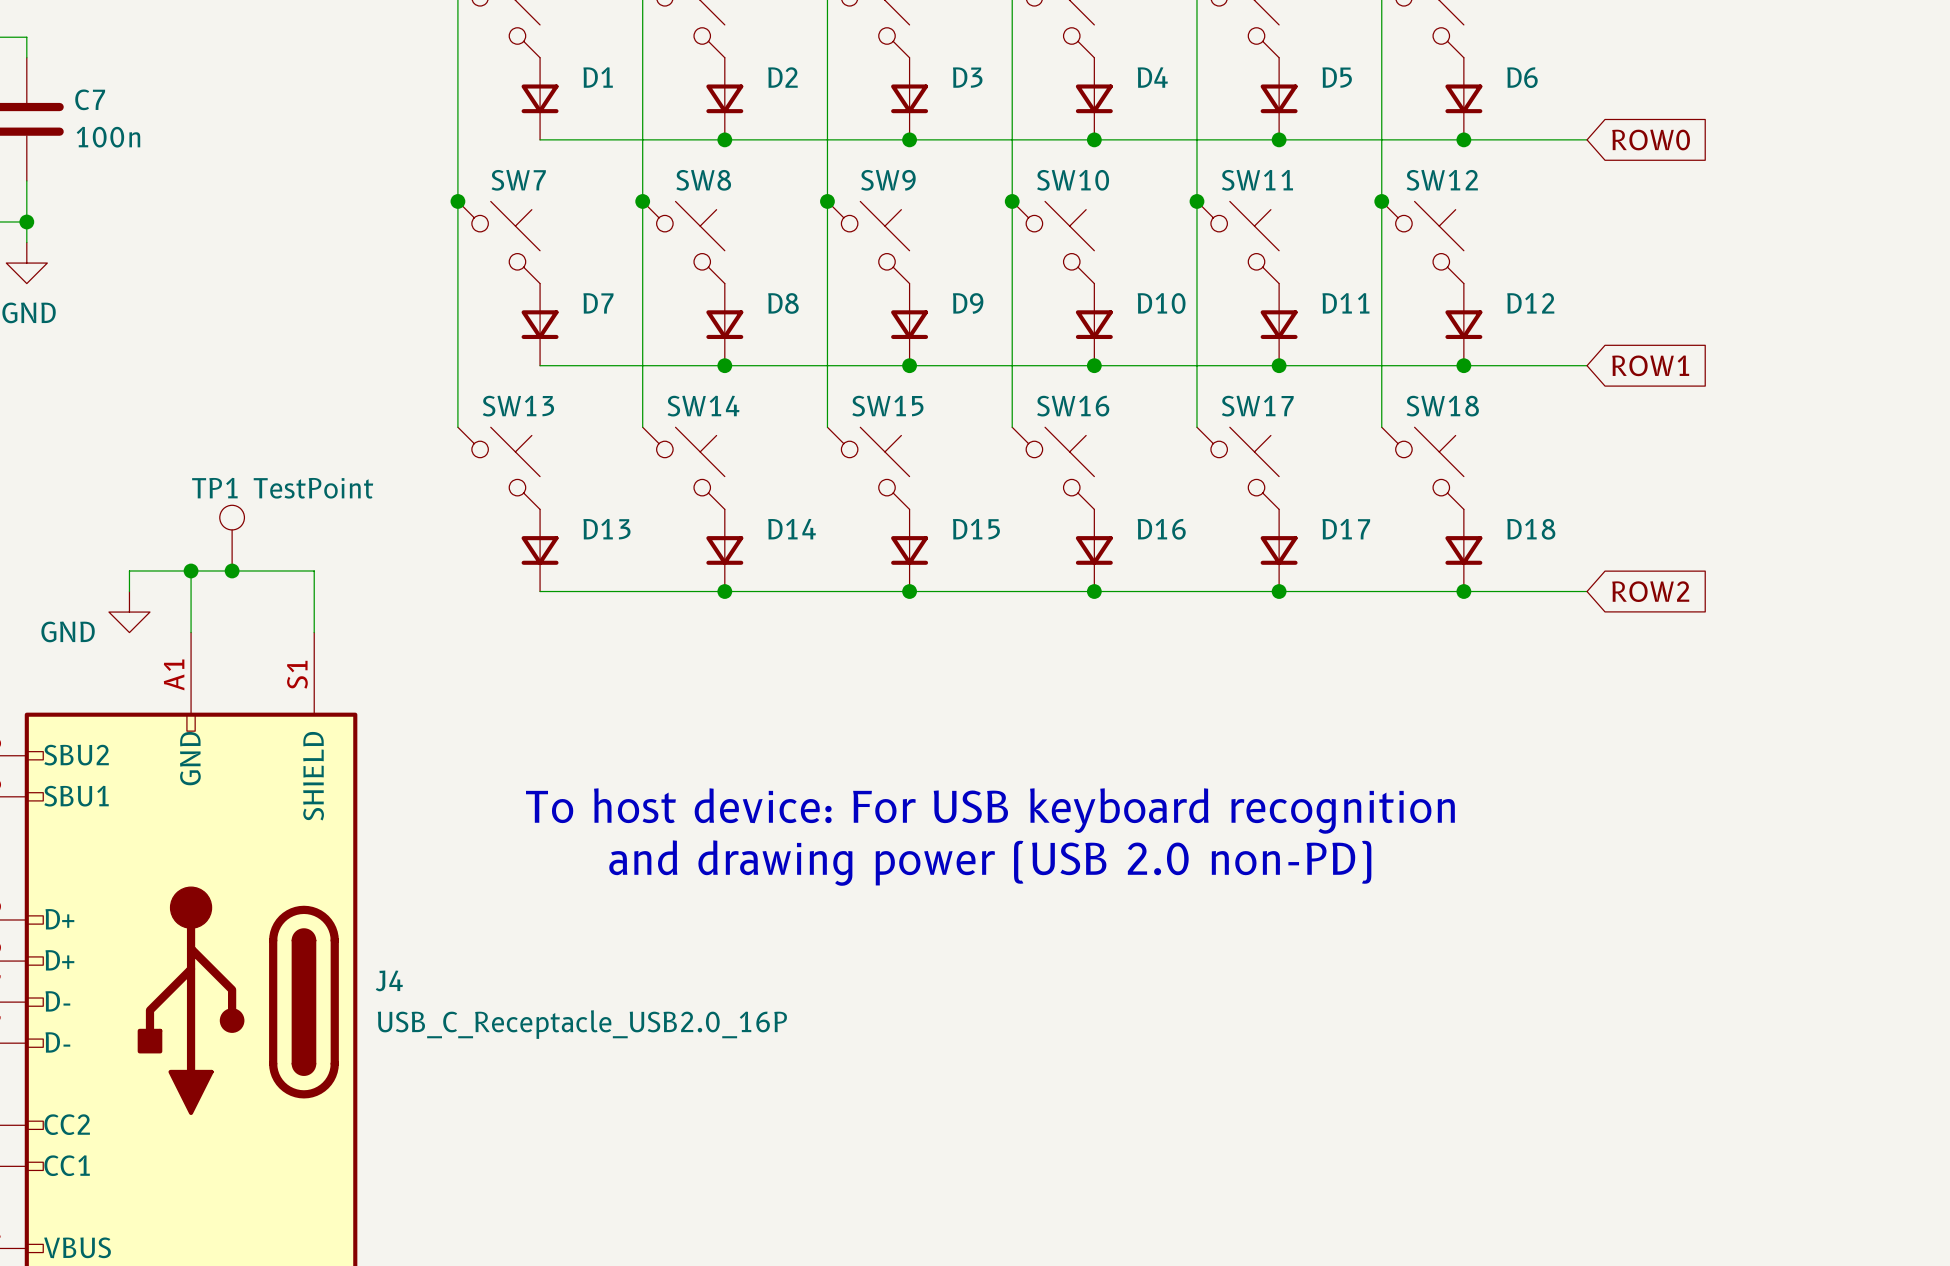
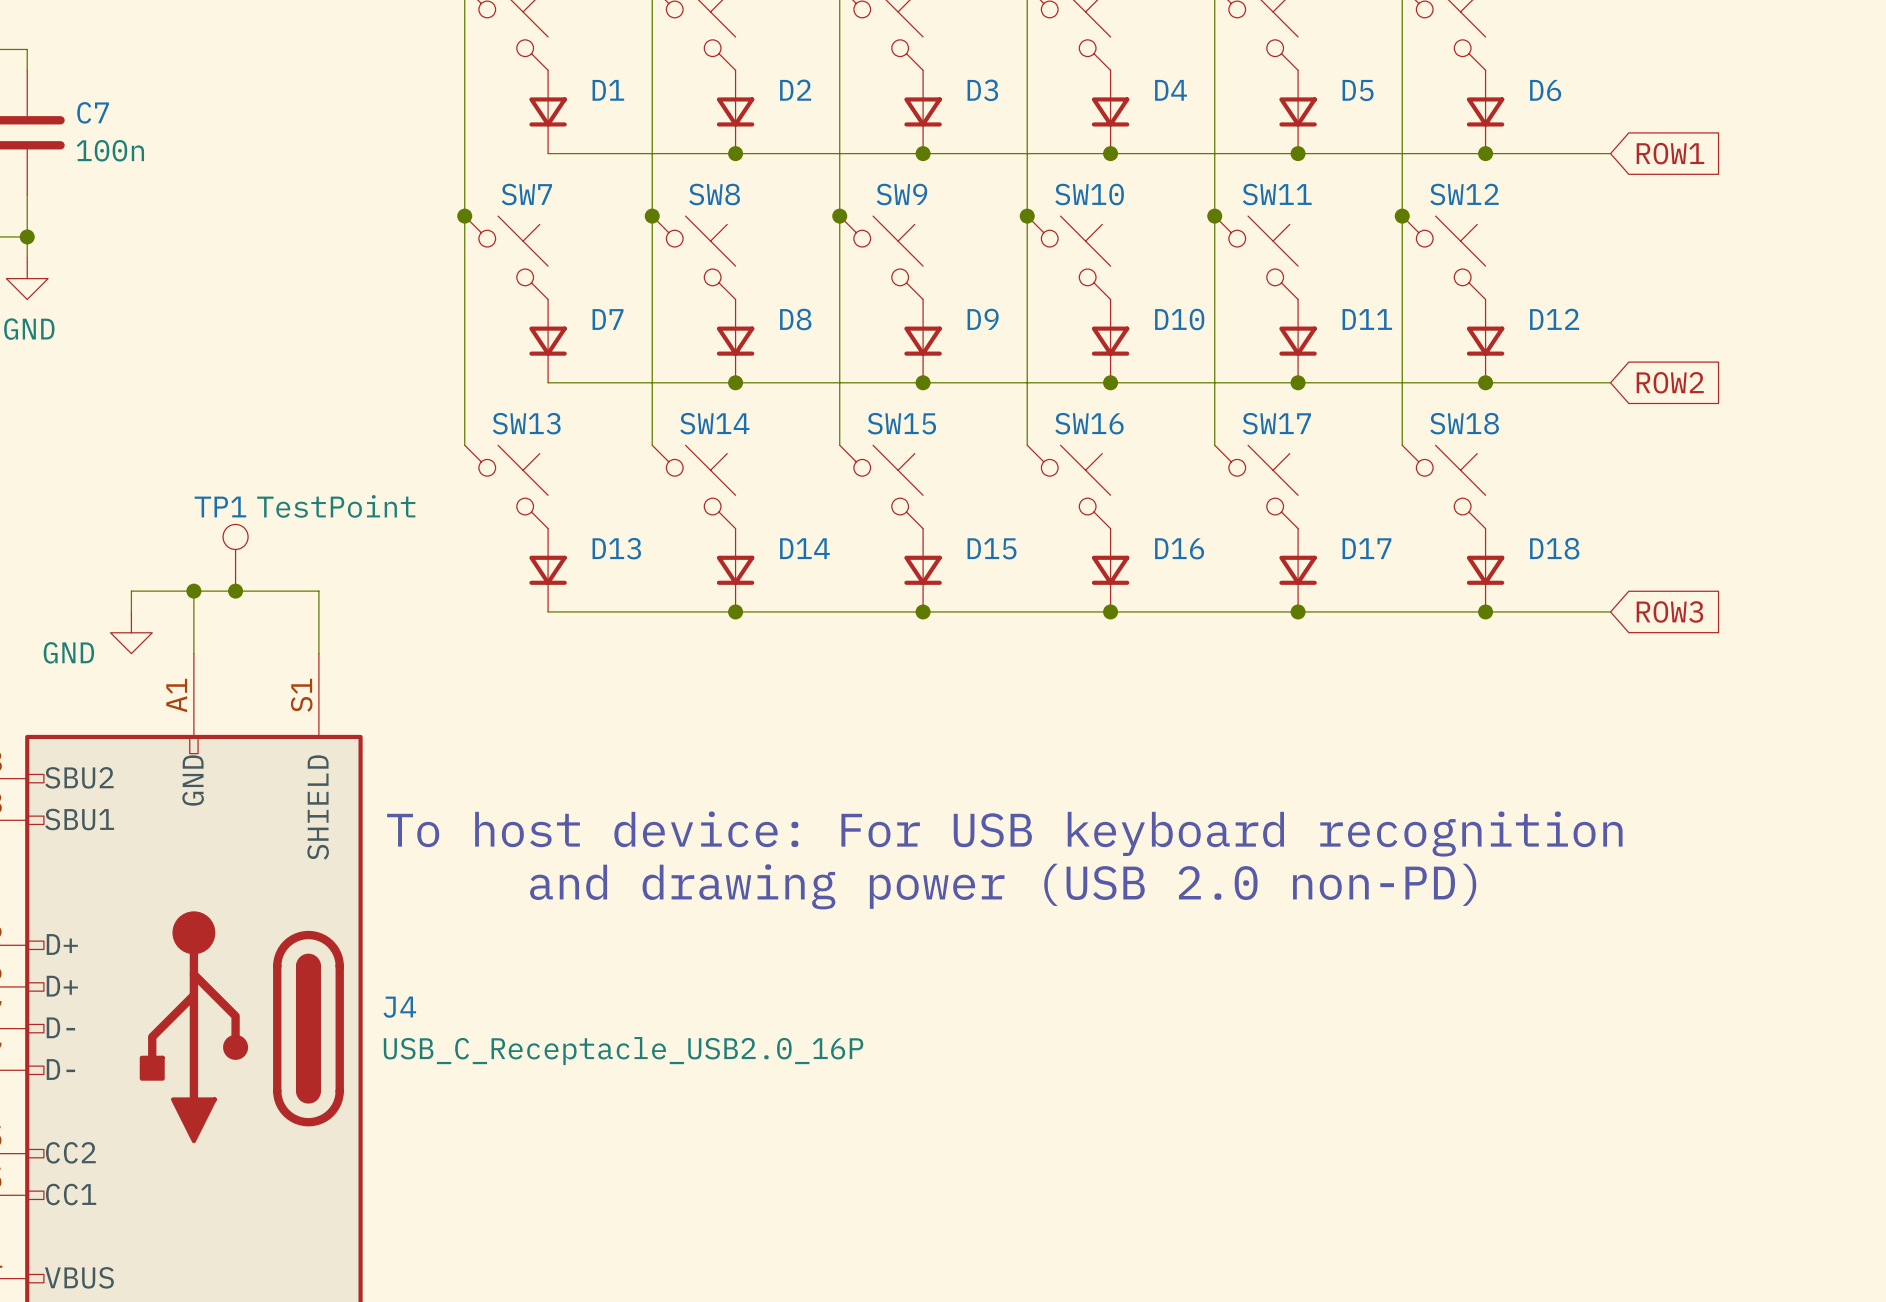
global label: ROW0 (1651, 139) -> ROW1 (1670, 153)
global label: ROW1 (1650, 365) -> ROW2 (1670, 382)
global label: ROW2 (1650, 591) -> ROW3 (1669, 611)

